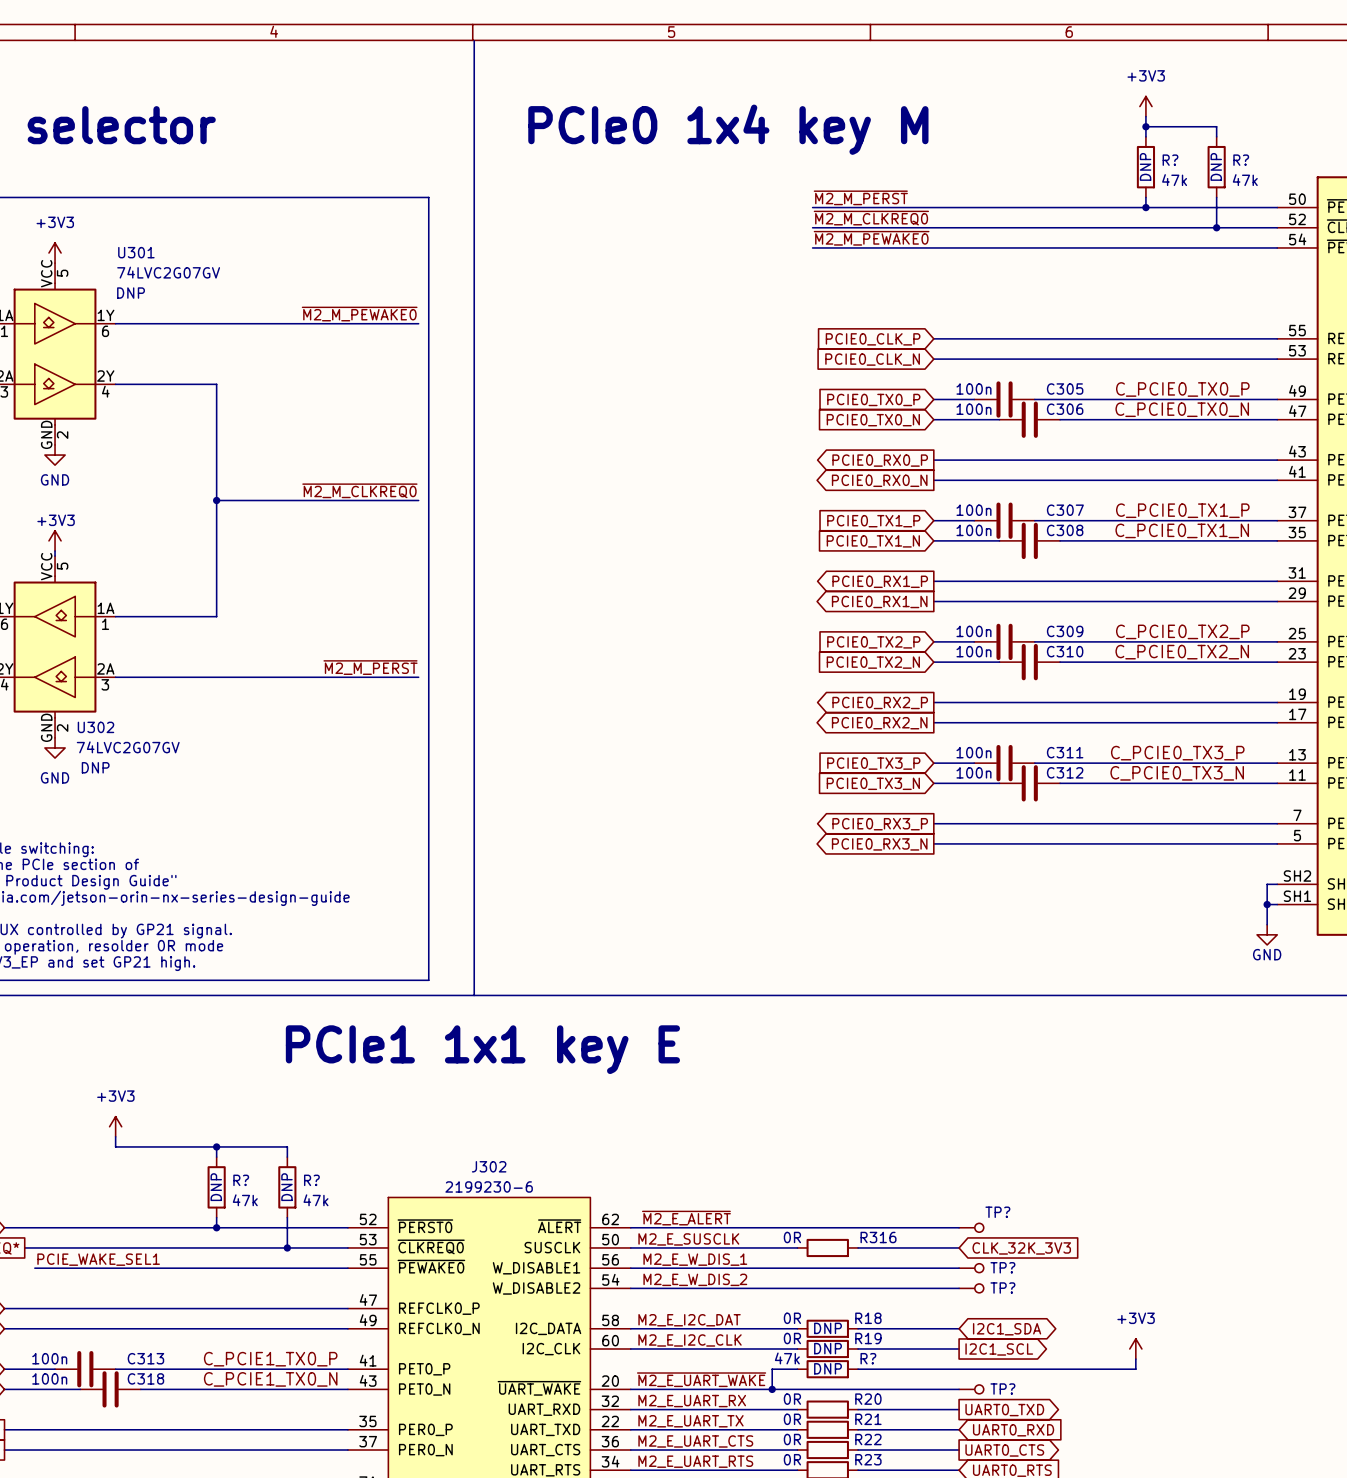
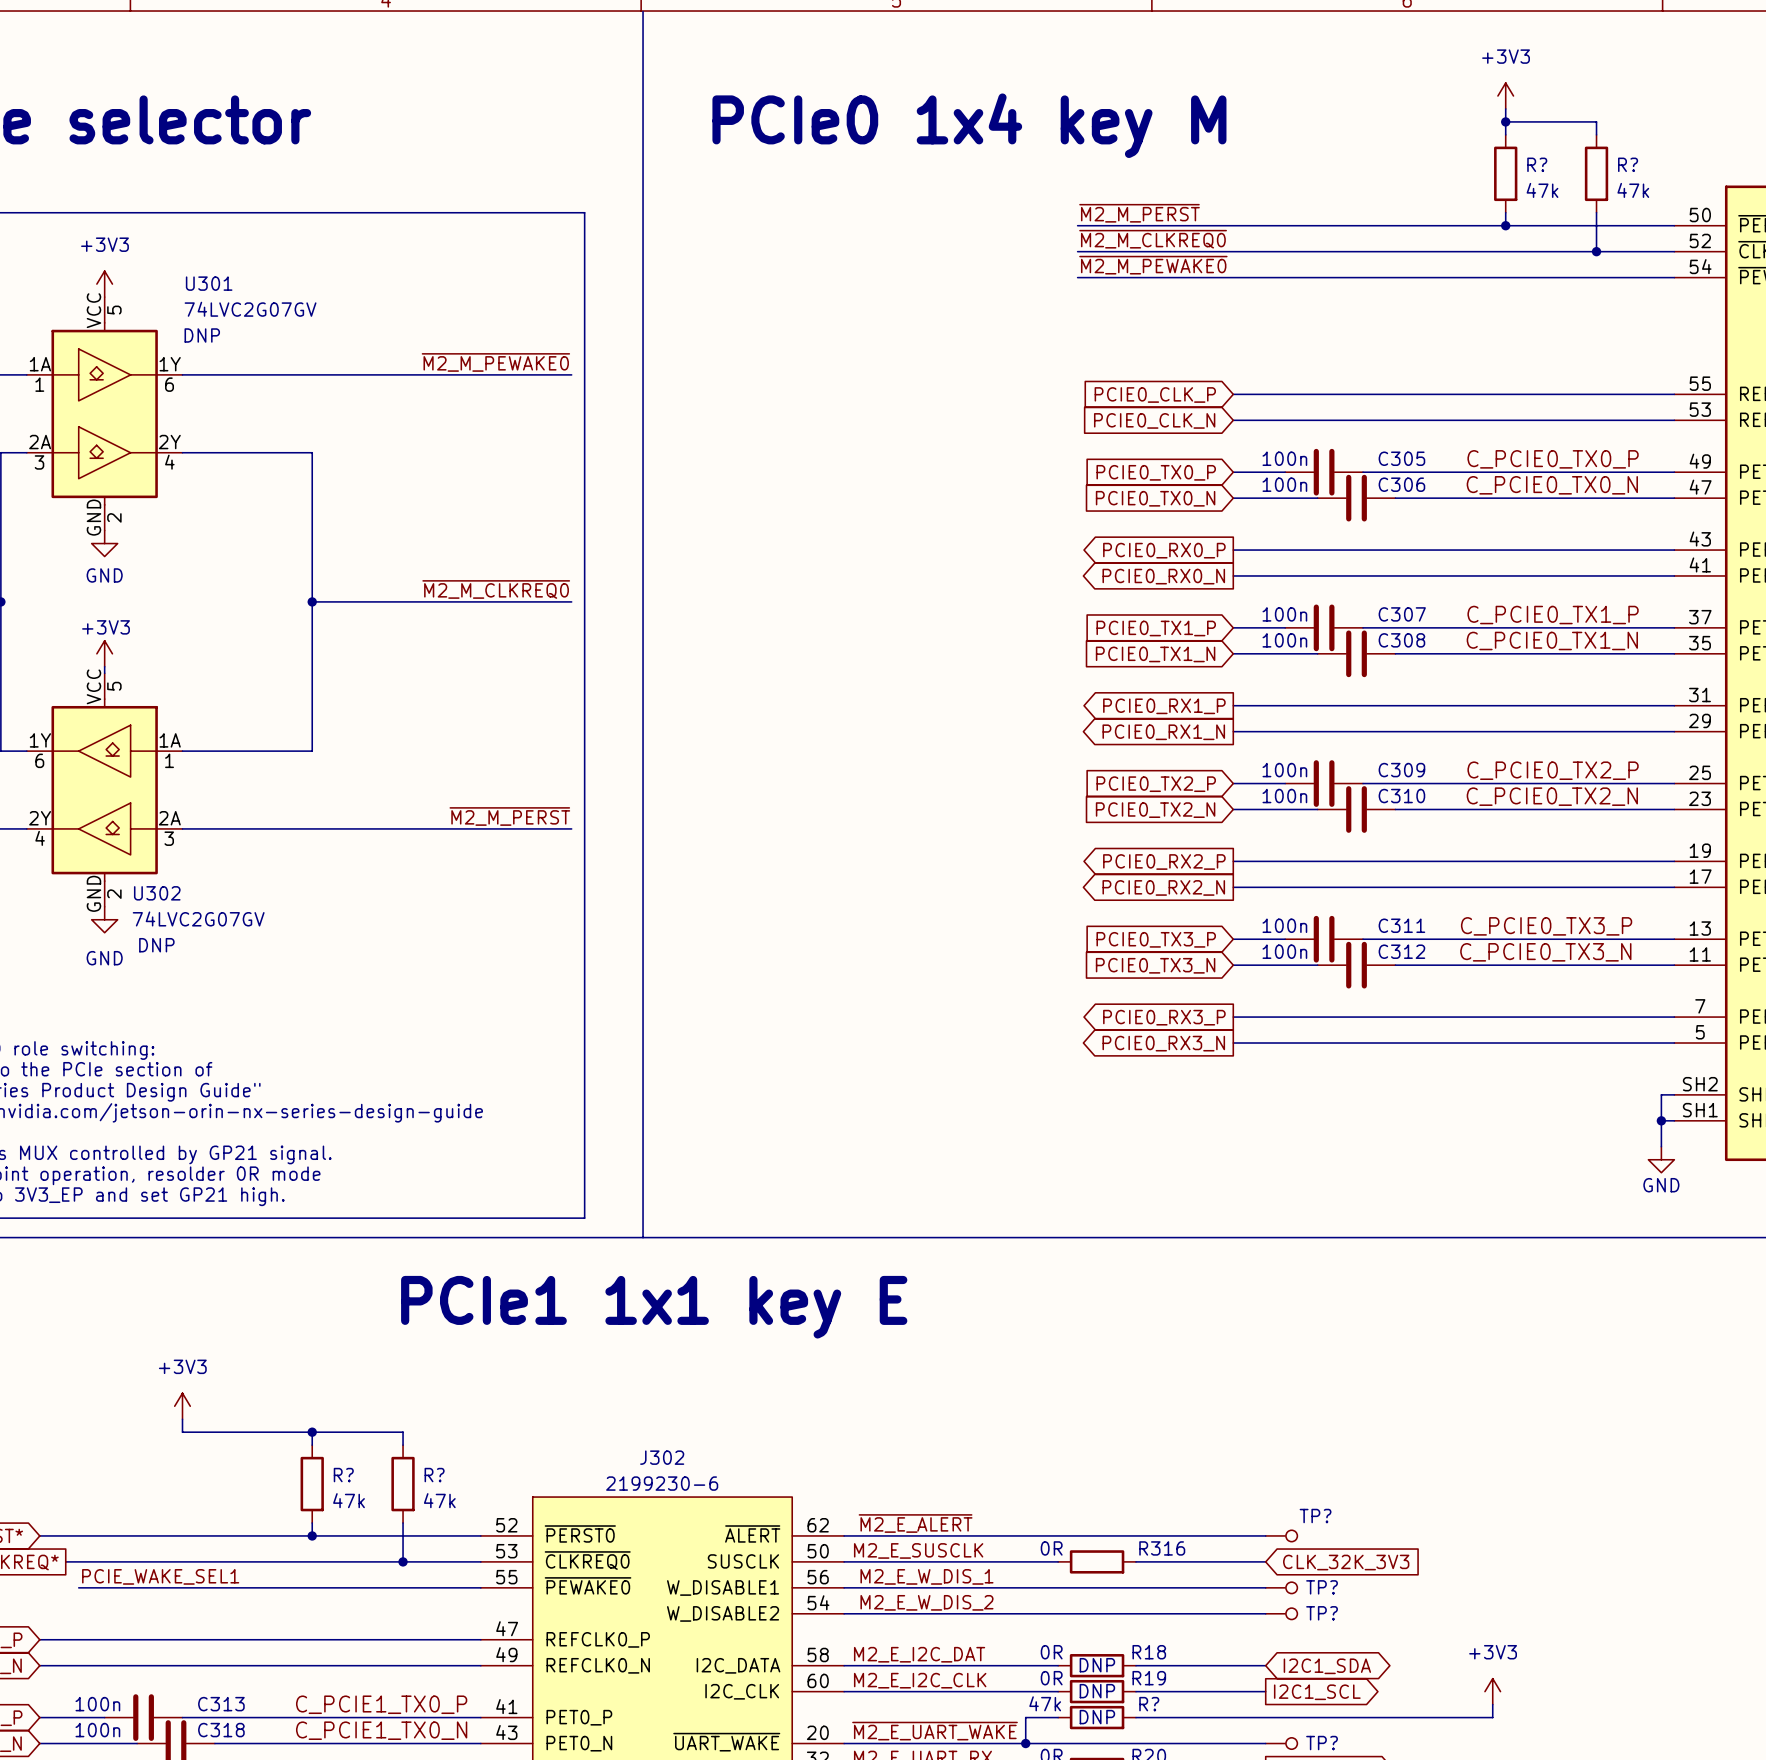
R? text: DNP (1145, 166) -> none
R? text: DNP (1216, 166) -> none
R? text: DNP (216, 1187) -> none
R? text: DNP (286, 1187) -> none

